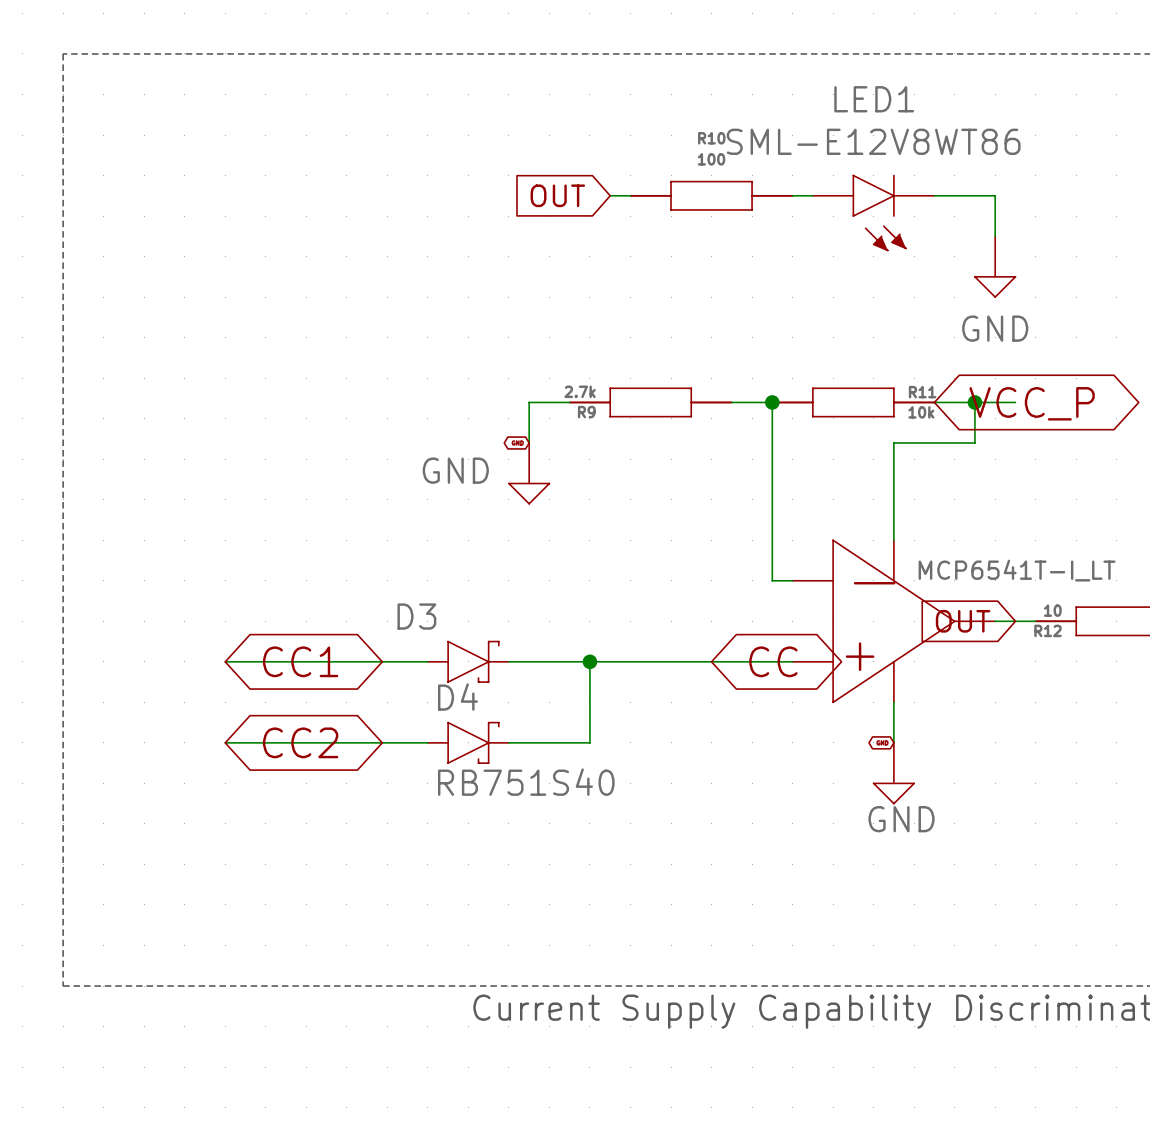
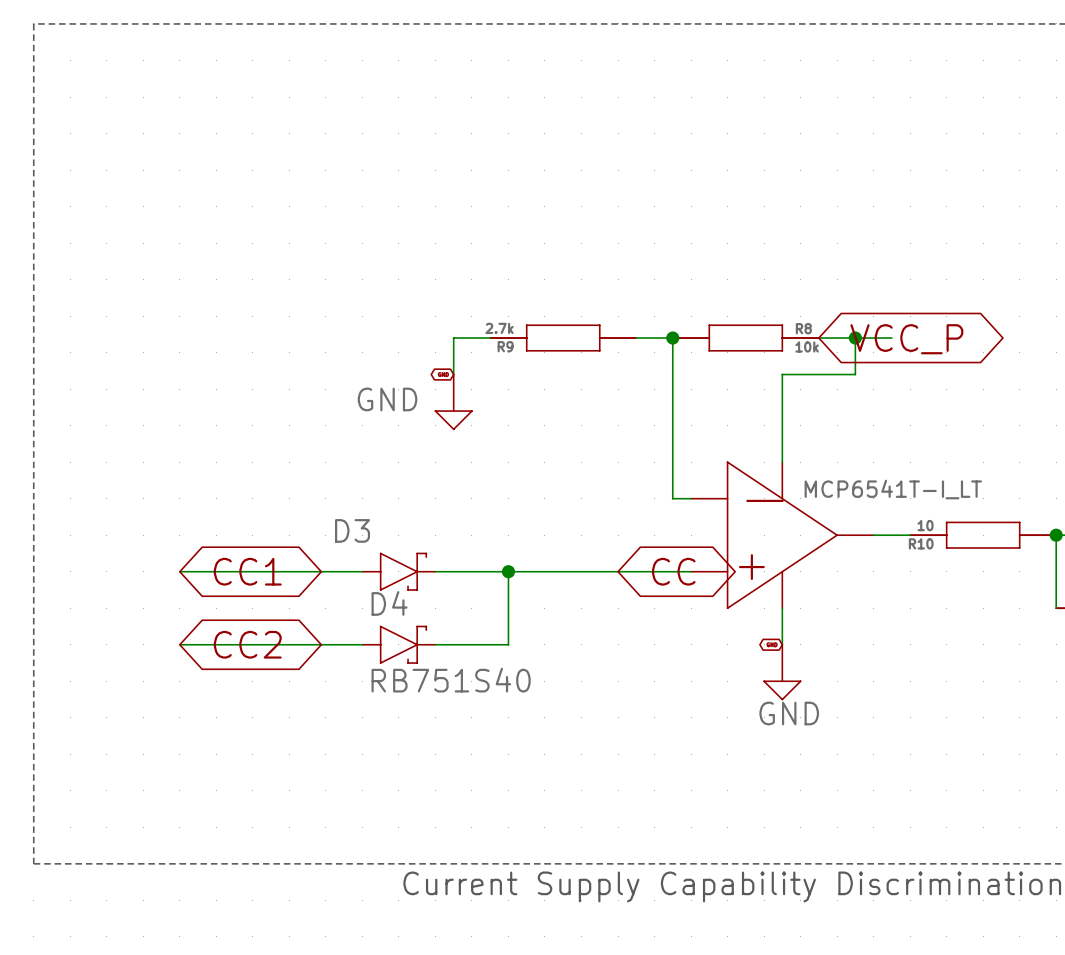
global label: OUT (557, 195) -> none
wire: (610, 195) (630, 195) -> none
R10: 100 (711, 195) -> none
wire: (792, 195) (812, 195) -> none
wire: (934, 195) (995, 195) (995, 236) -> none
LED1: SML-E12V8WT86 (873, 213) -> none
power symbol: GND (995, 266) -> none
R11 name: R11 (922, 392) -> R8 (803, 328)
global label: OUT (963, 621) -> none
R12 name: R12 (1048, 630) -> R10 (921, 543)

